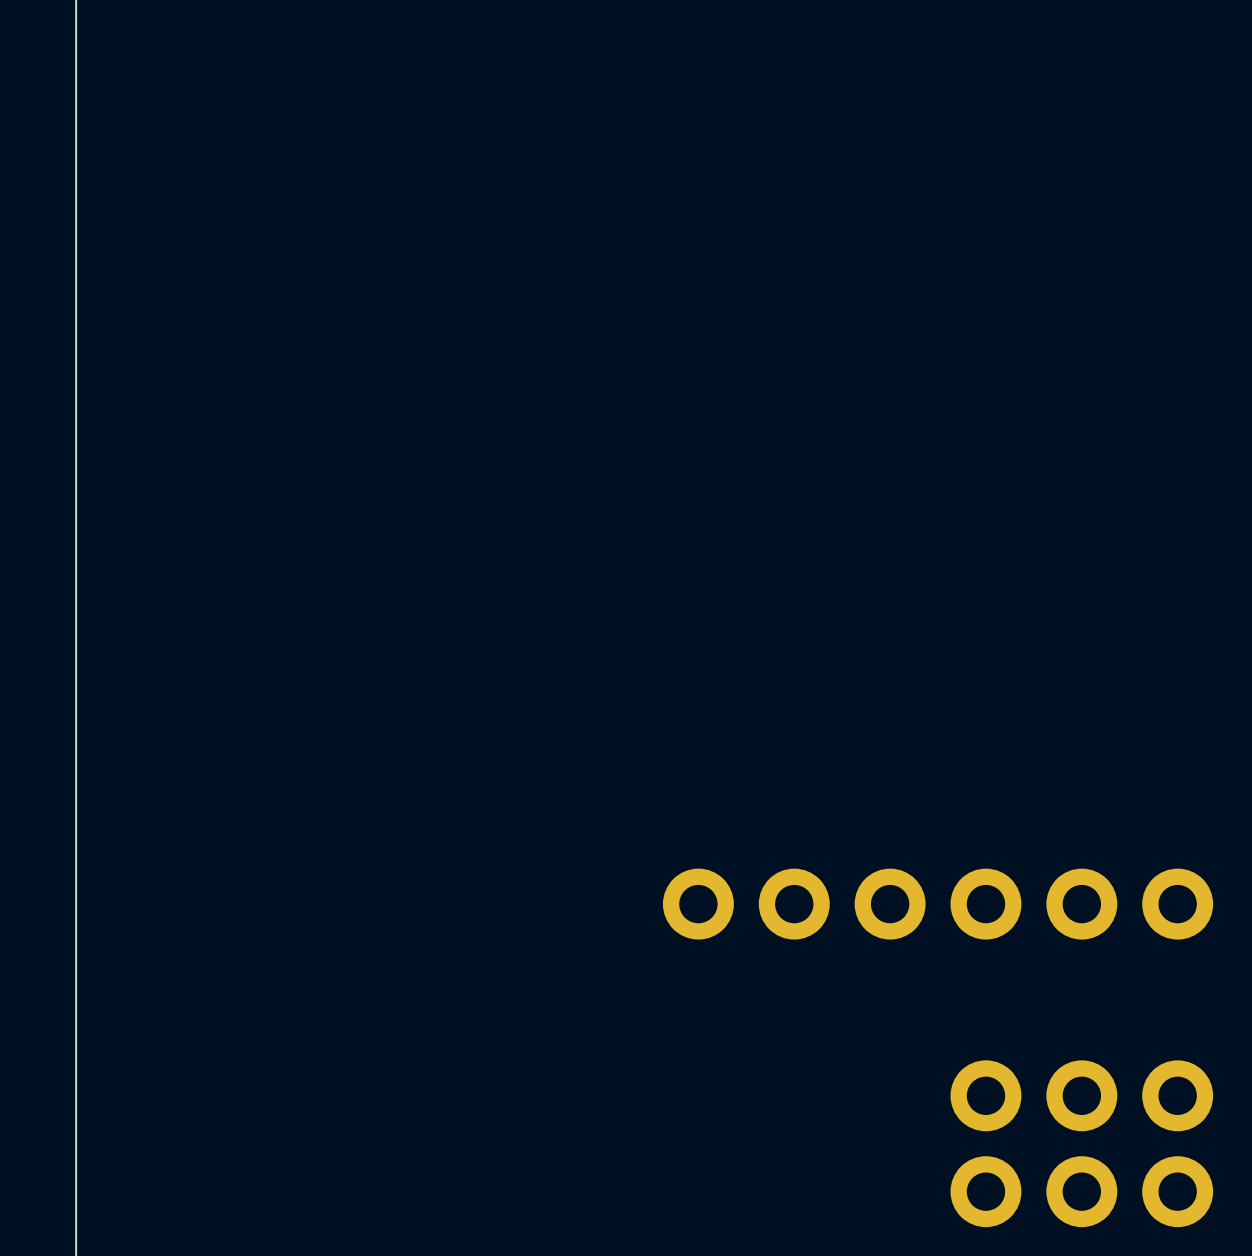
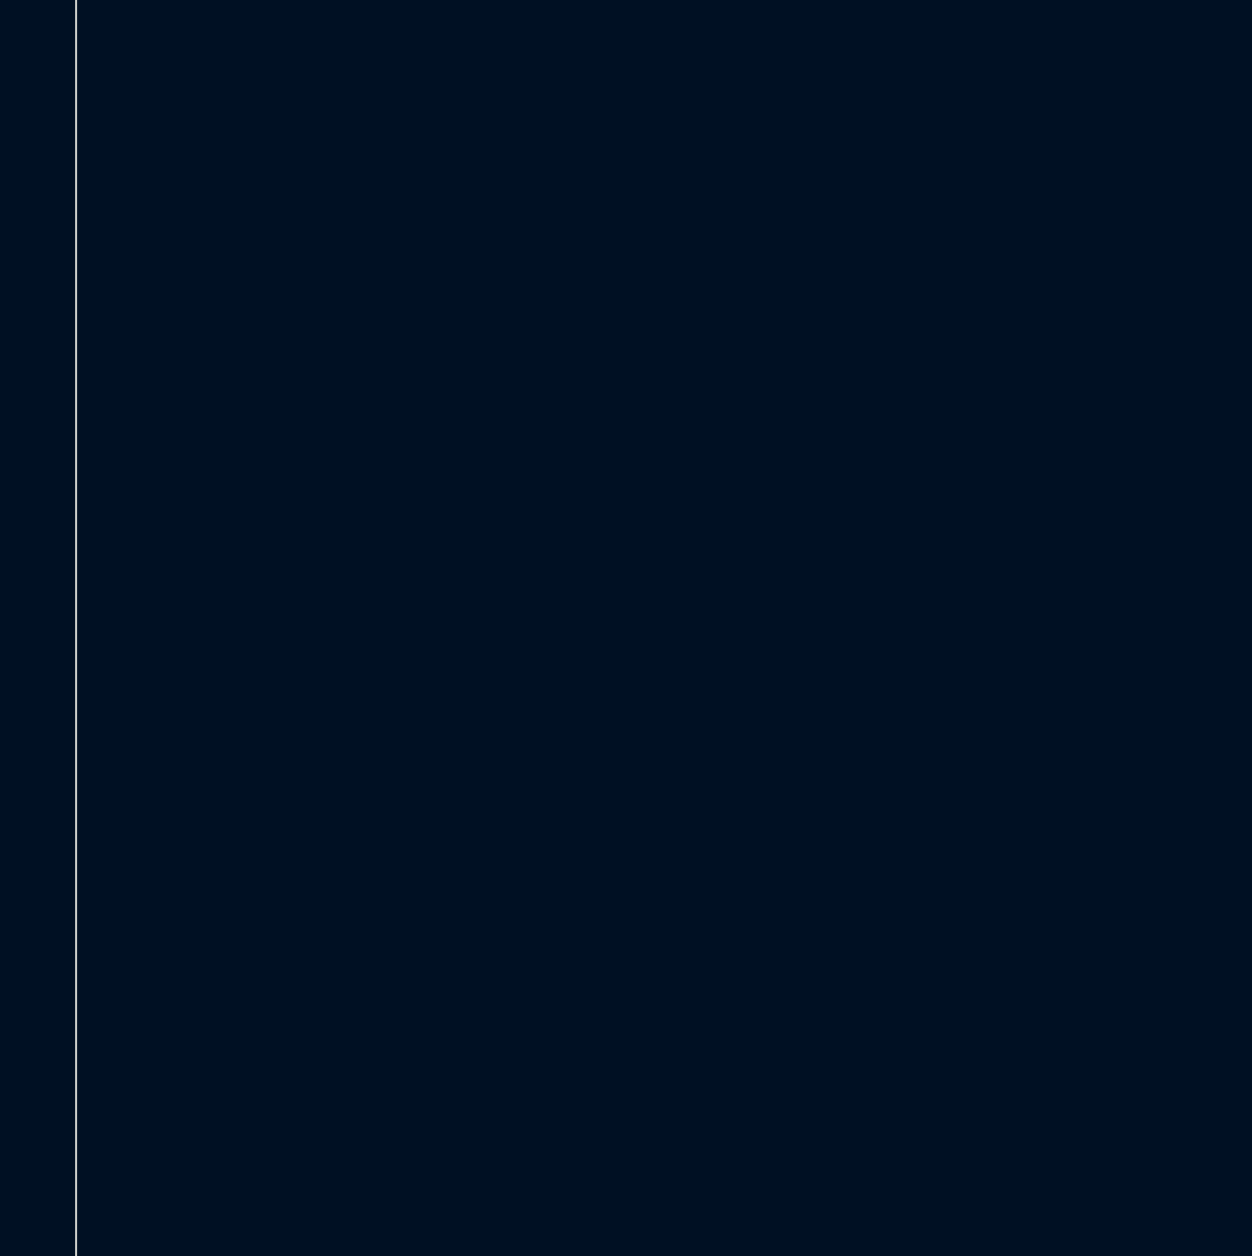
part: (938, 904) -> none
part: (1081, 1143) -> none

